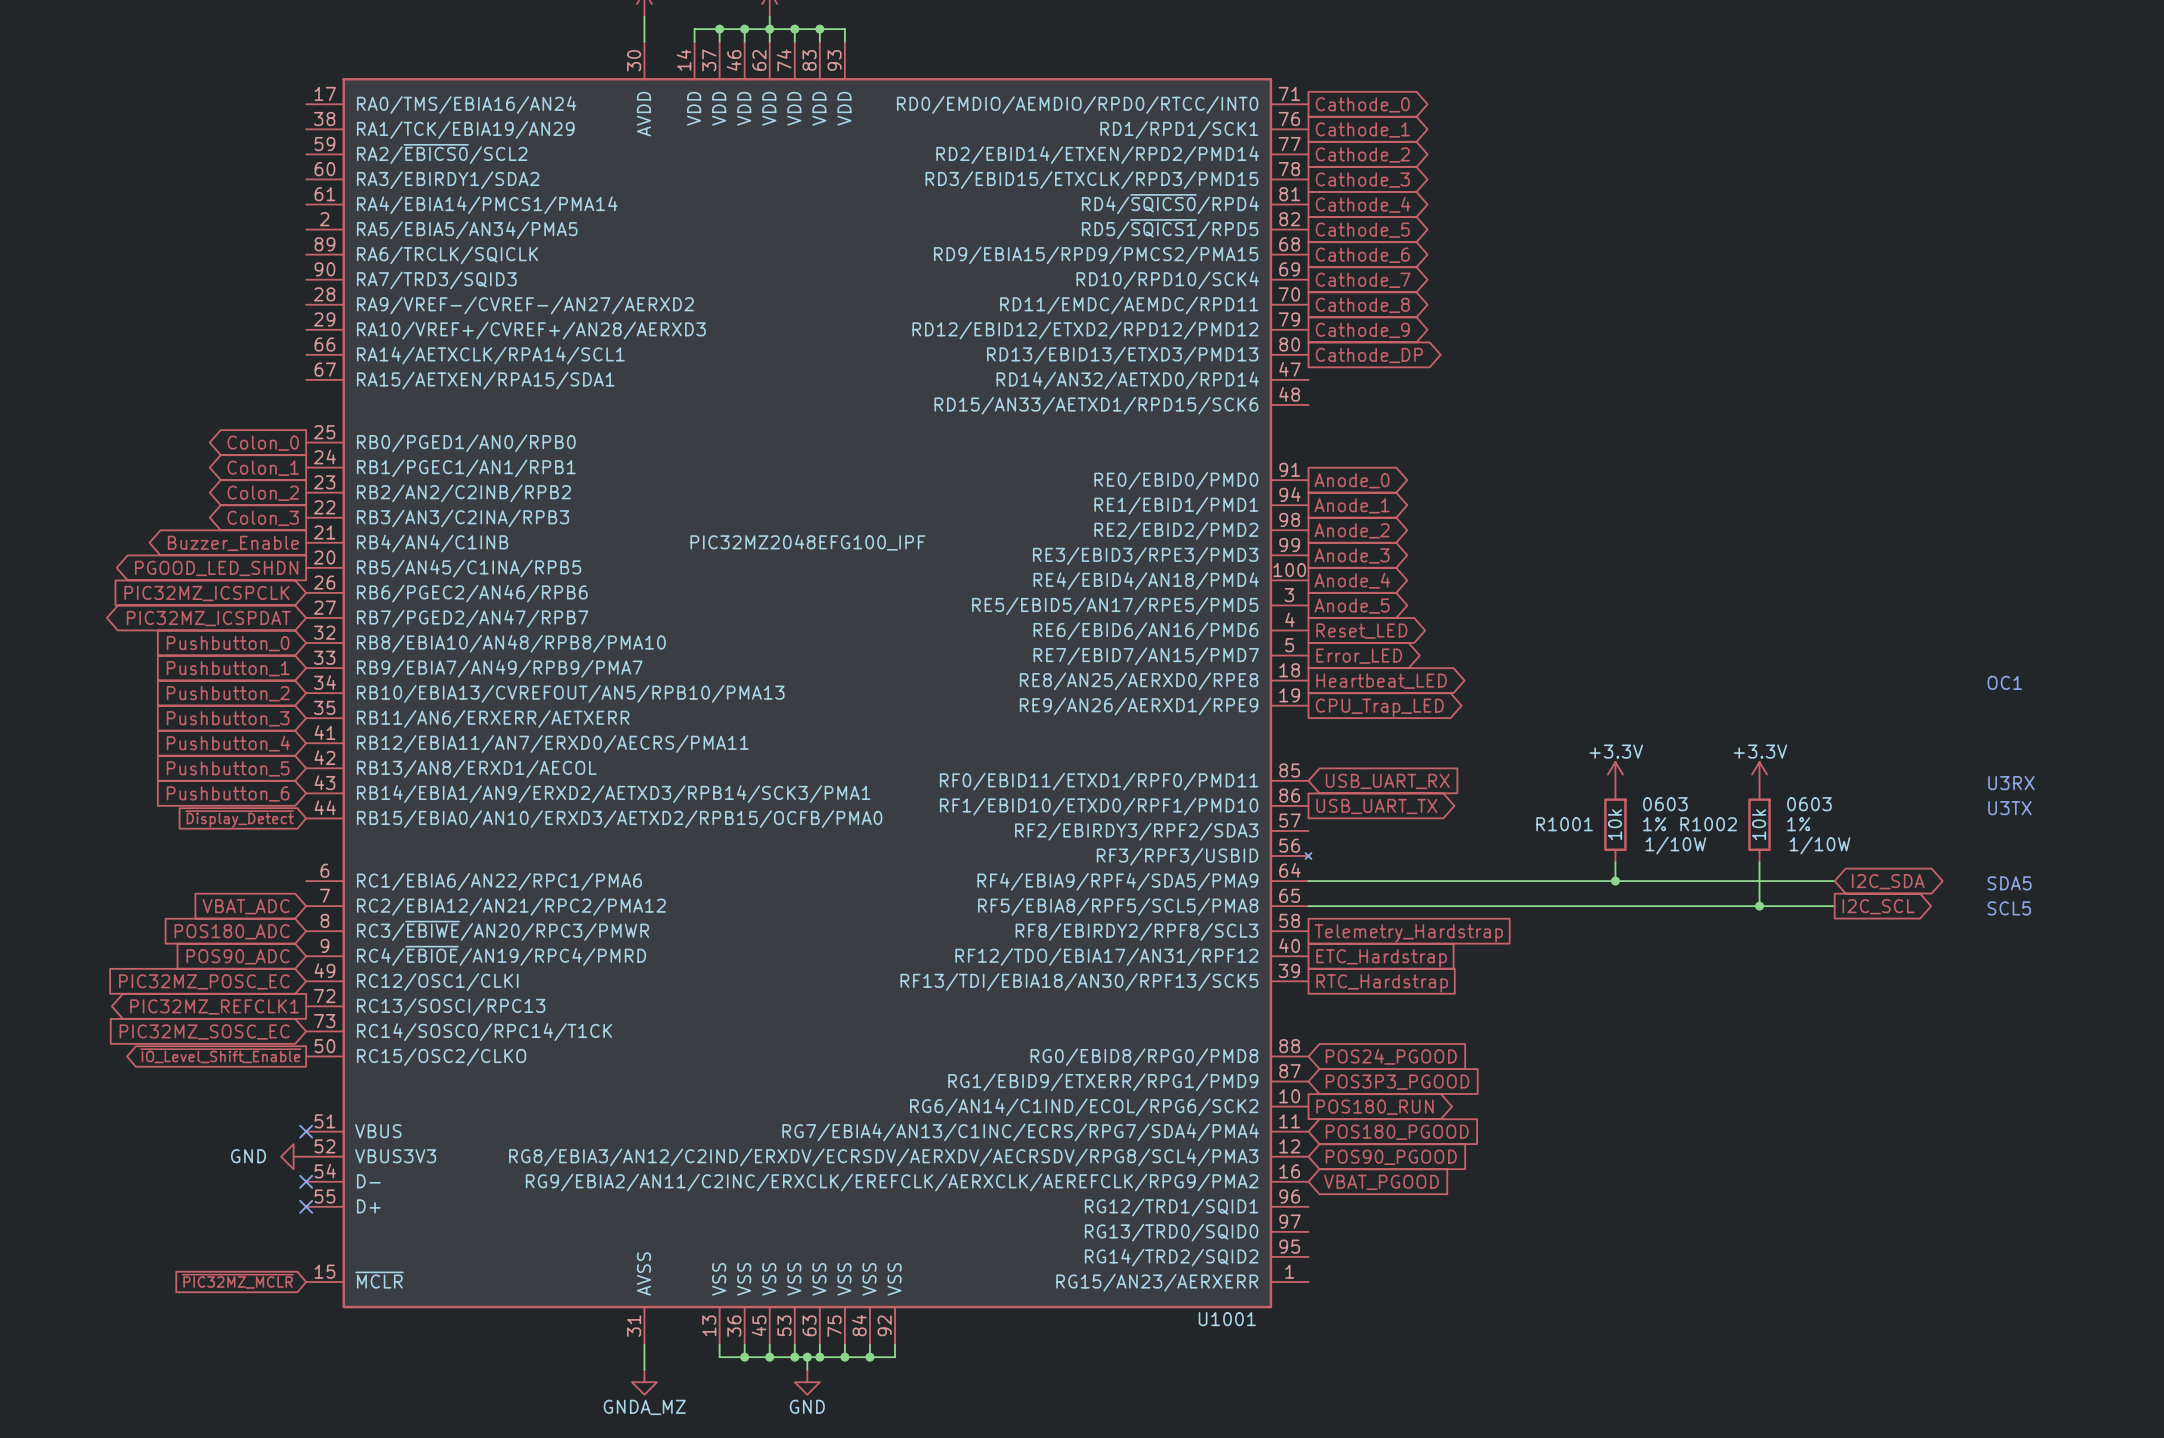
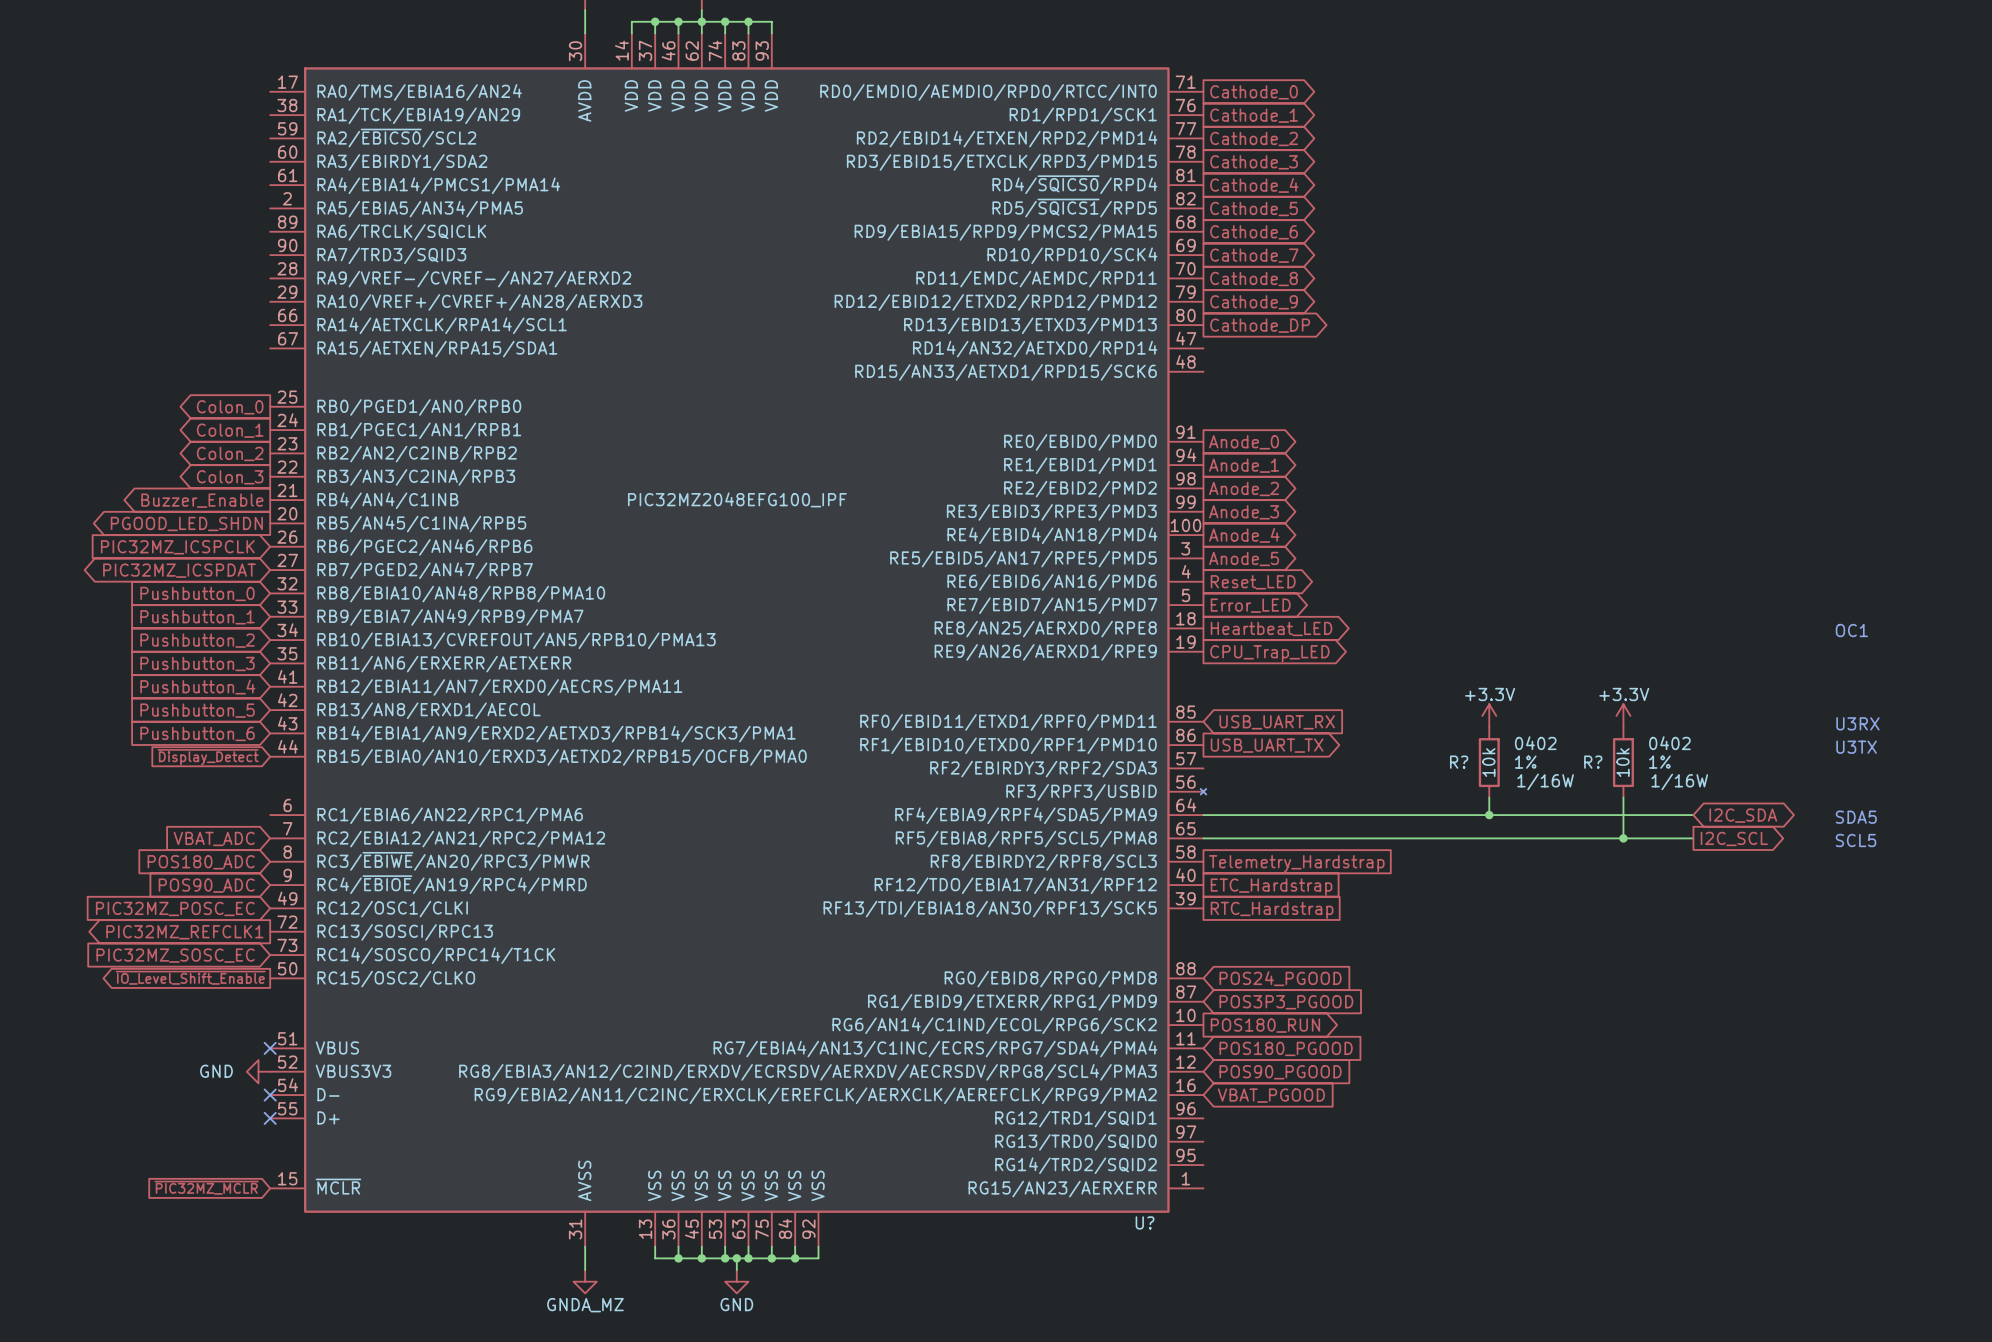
R1001 text: 0603 (1665, 804) -> 0402 (1535, 743)
R1002 text: 0603 (1809, 804) -> 0402 (1669, 743)
R1001 name: R1001 (1564, 824) -> R? (1459, 762)
R1002 name: R1002 (1708, 824) -> R? (1593, 762)
R1001 text: 1/10W (1675, 845) -> 1/16W (1545, 781)
R1002 text: 1/10W (1819, 845) -> 1/16W (1679, 781)
U1001 name: U1001 (1227, 1319) -> U? (1145, 1222)

